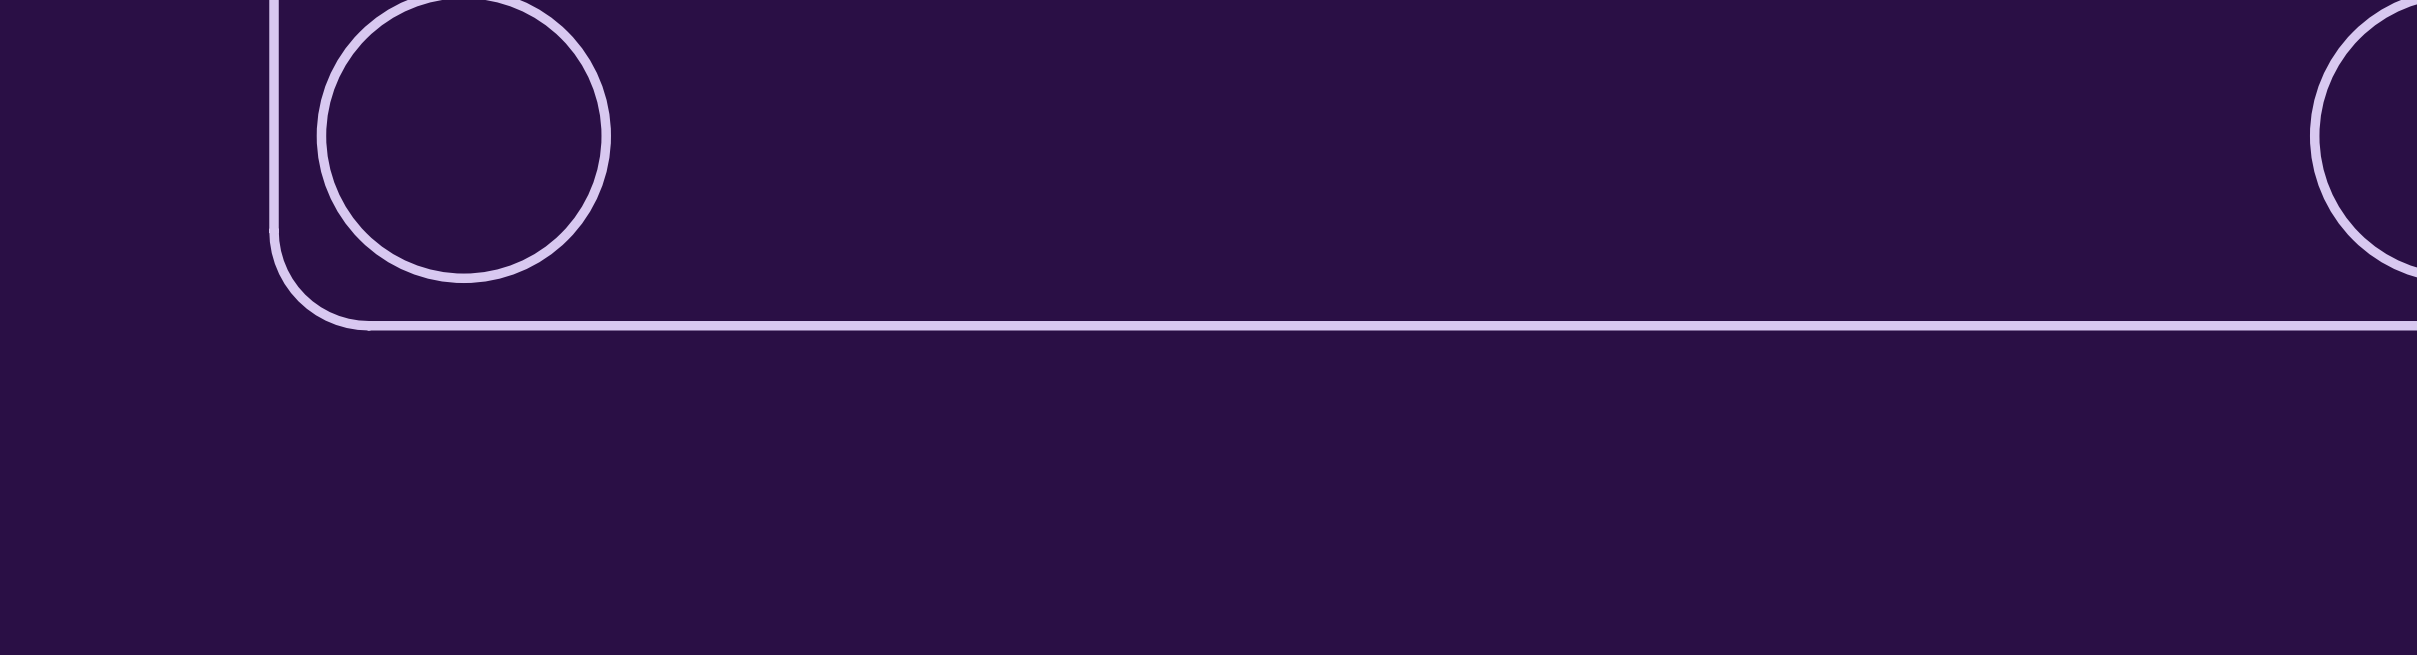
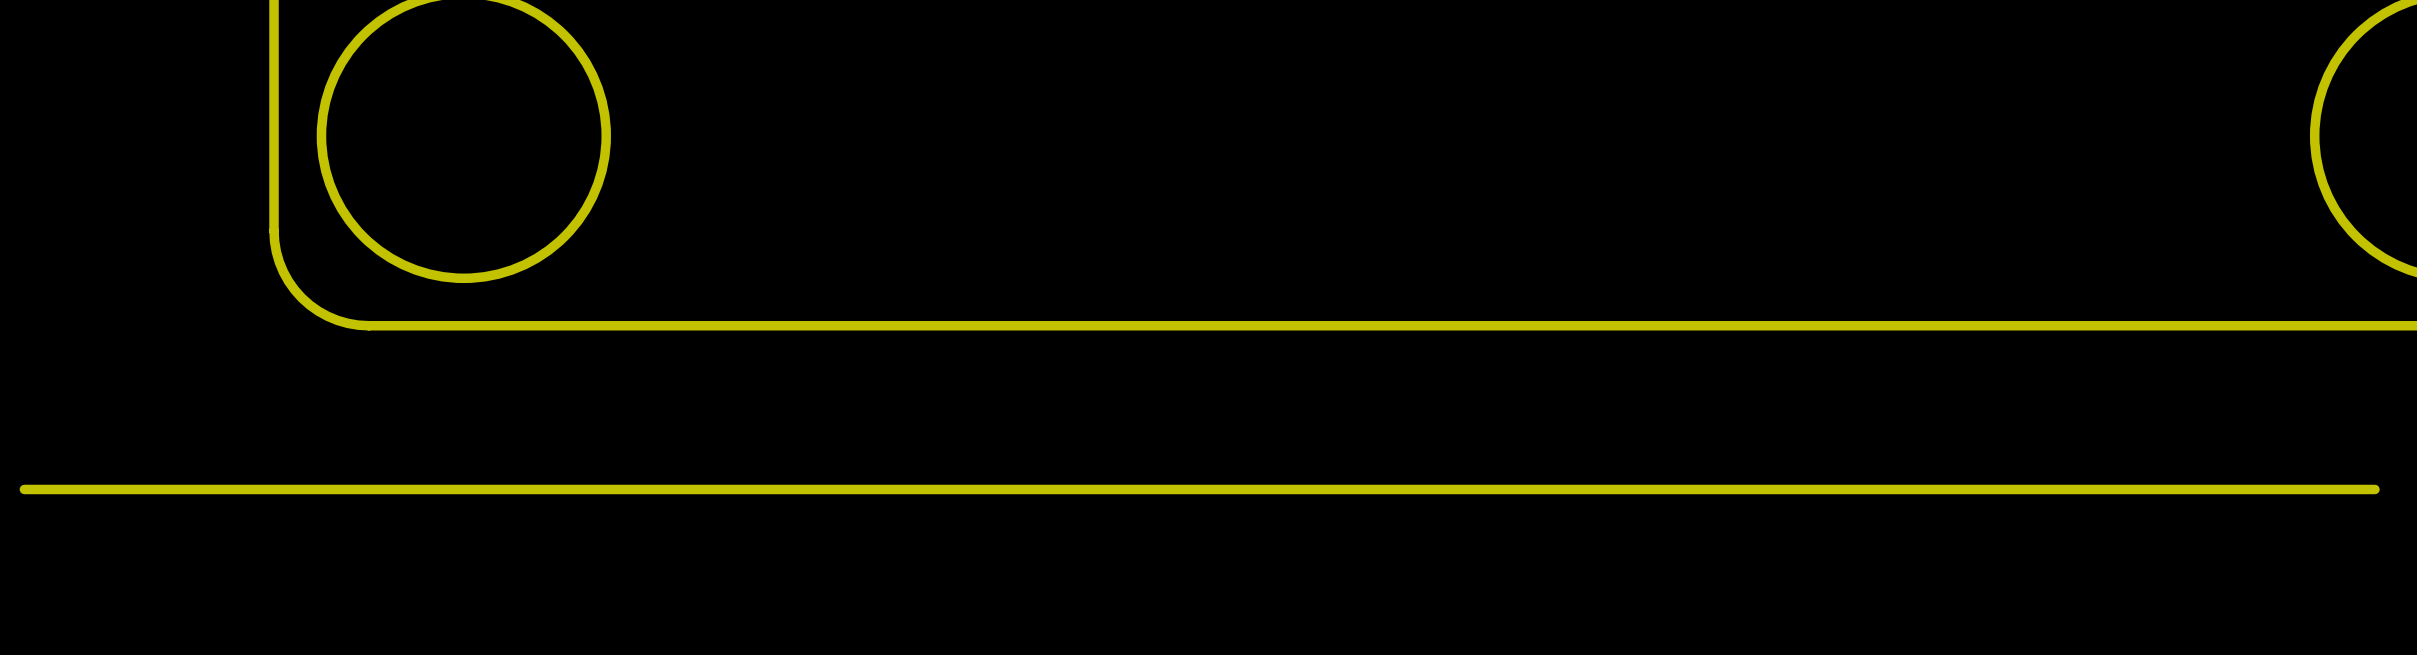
board edge: none -> (2374, 489) (24, 489)

